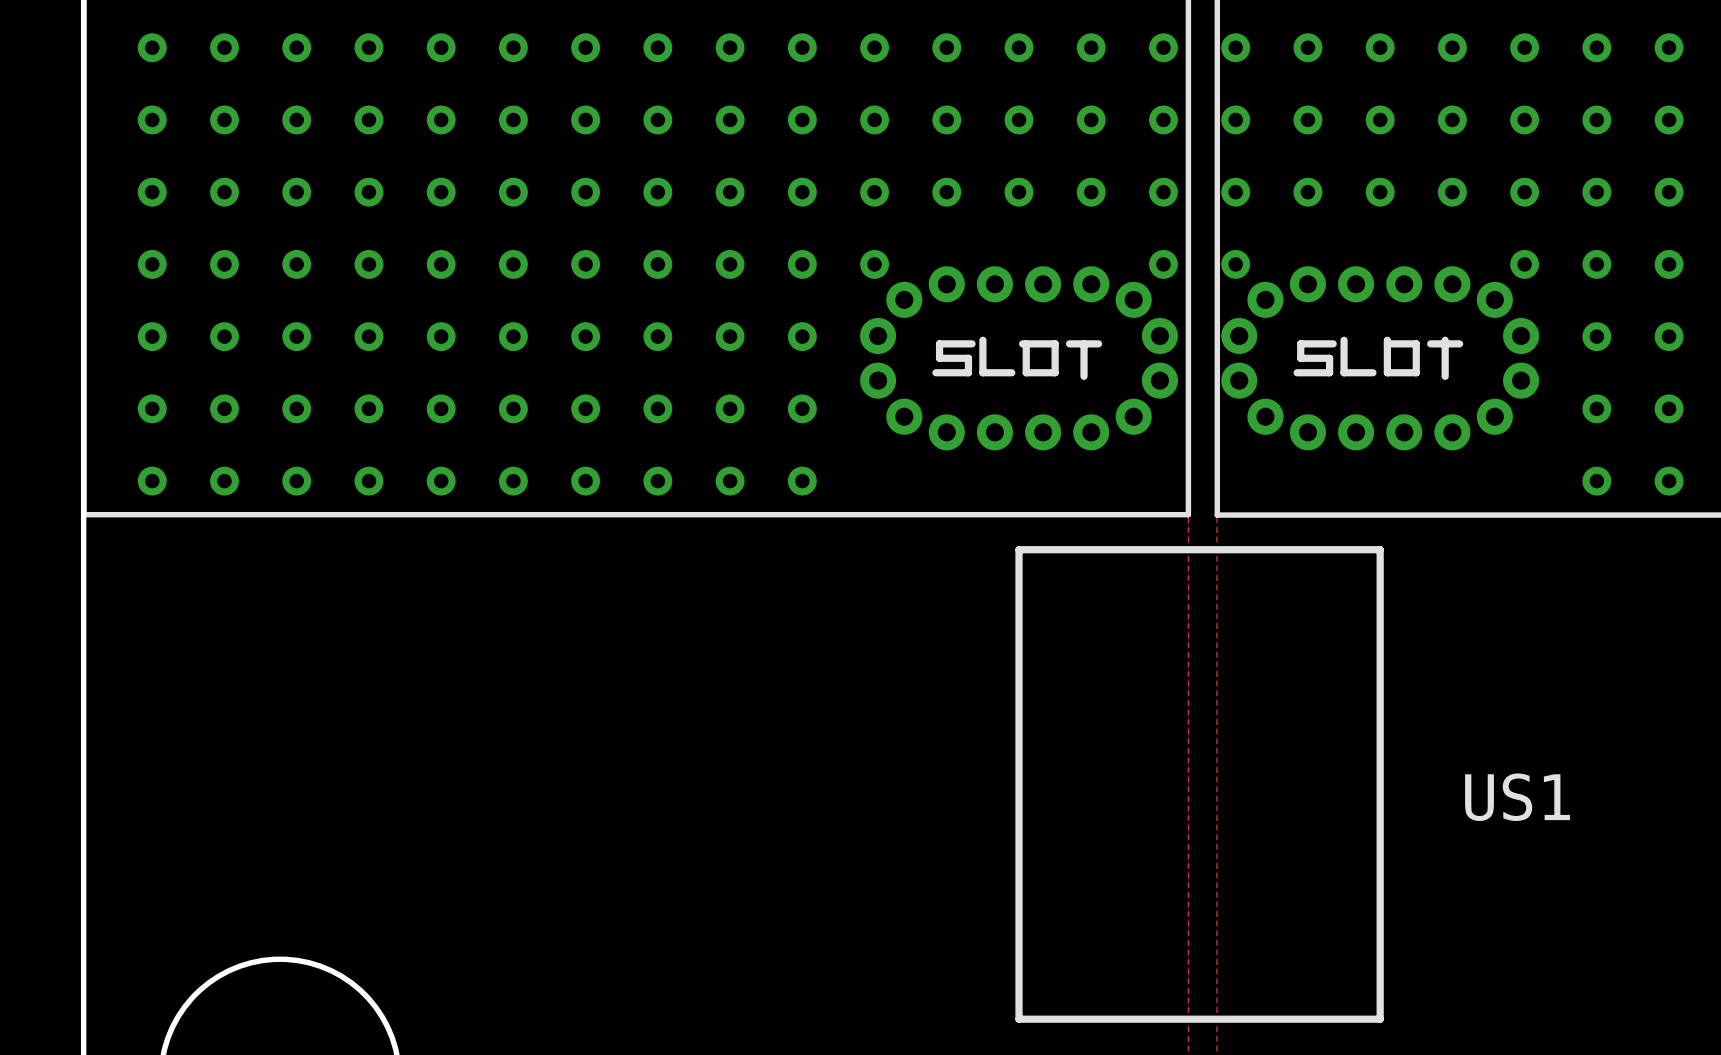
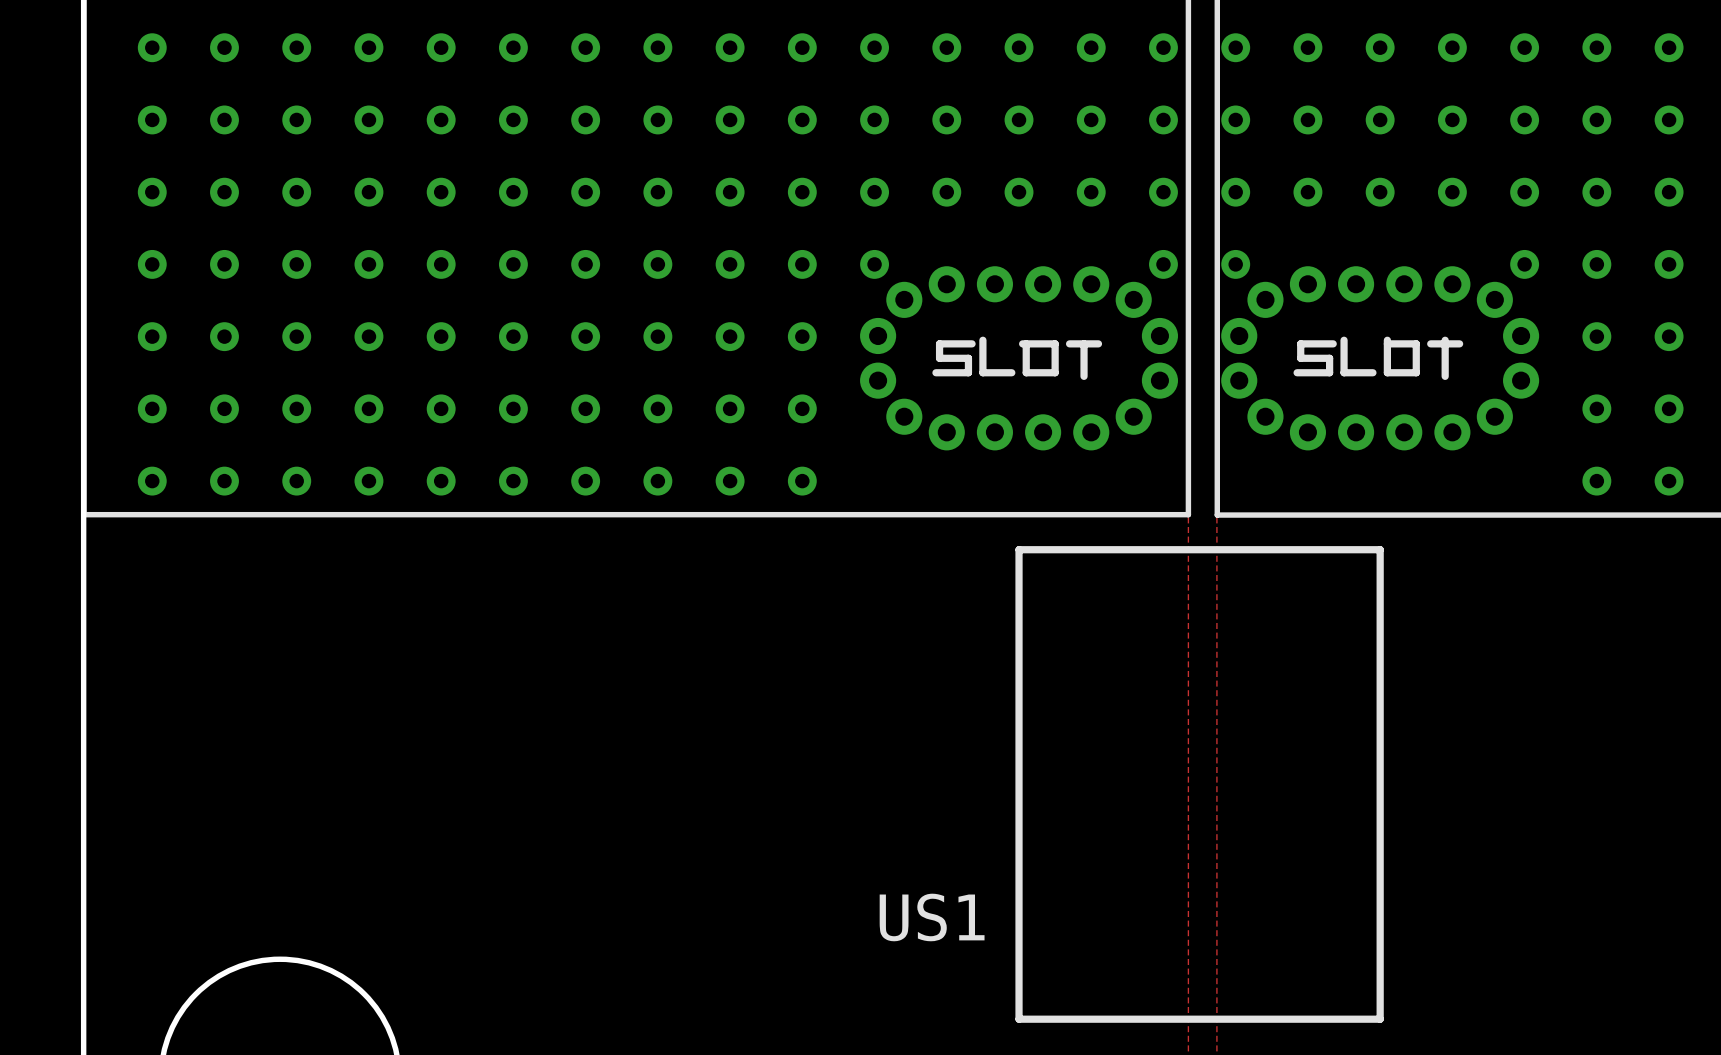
US1 name position: US1 (1517, 797) -> US1 (932, 917)

